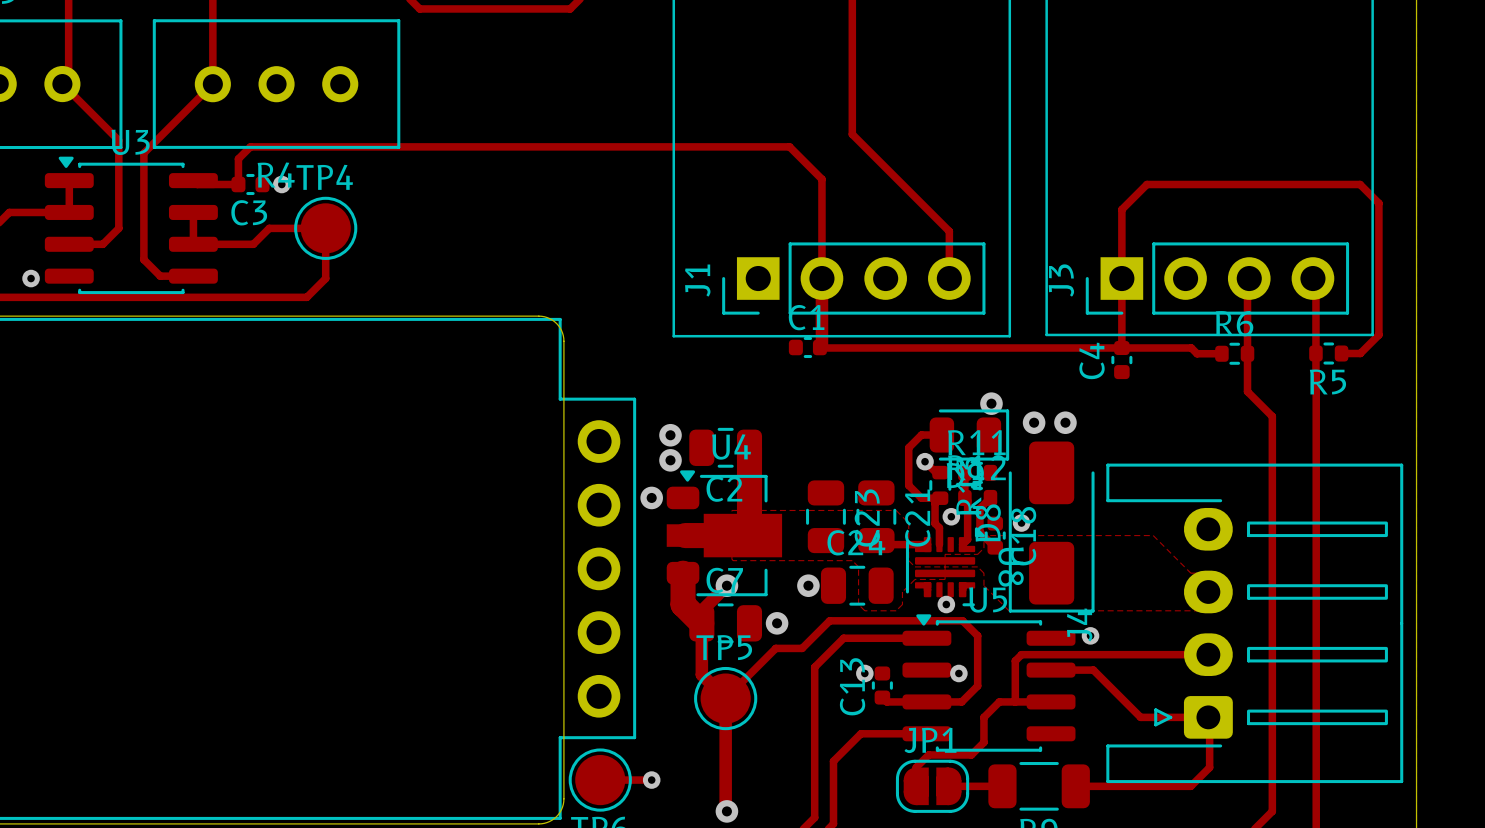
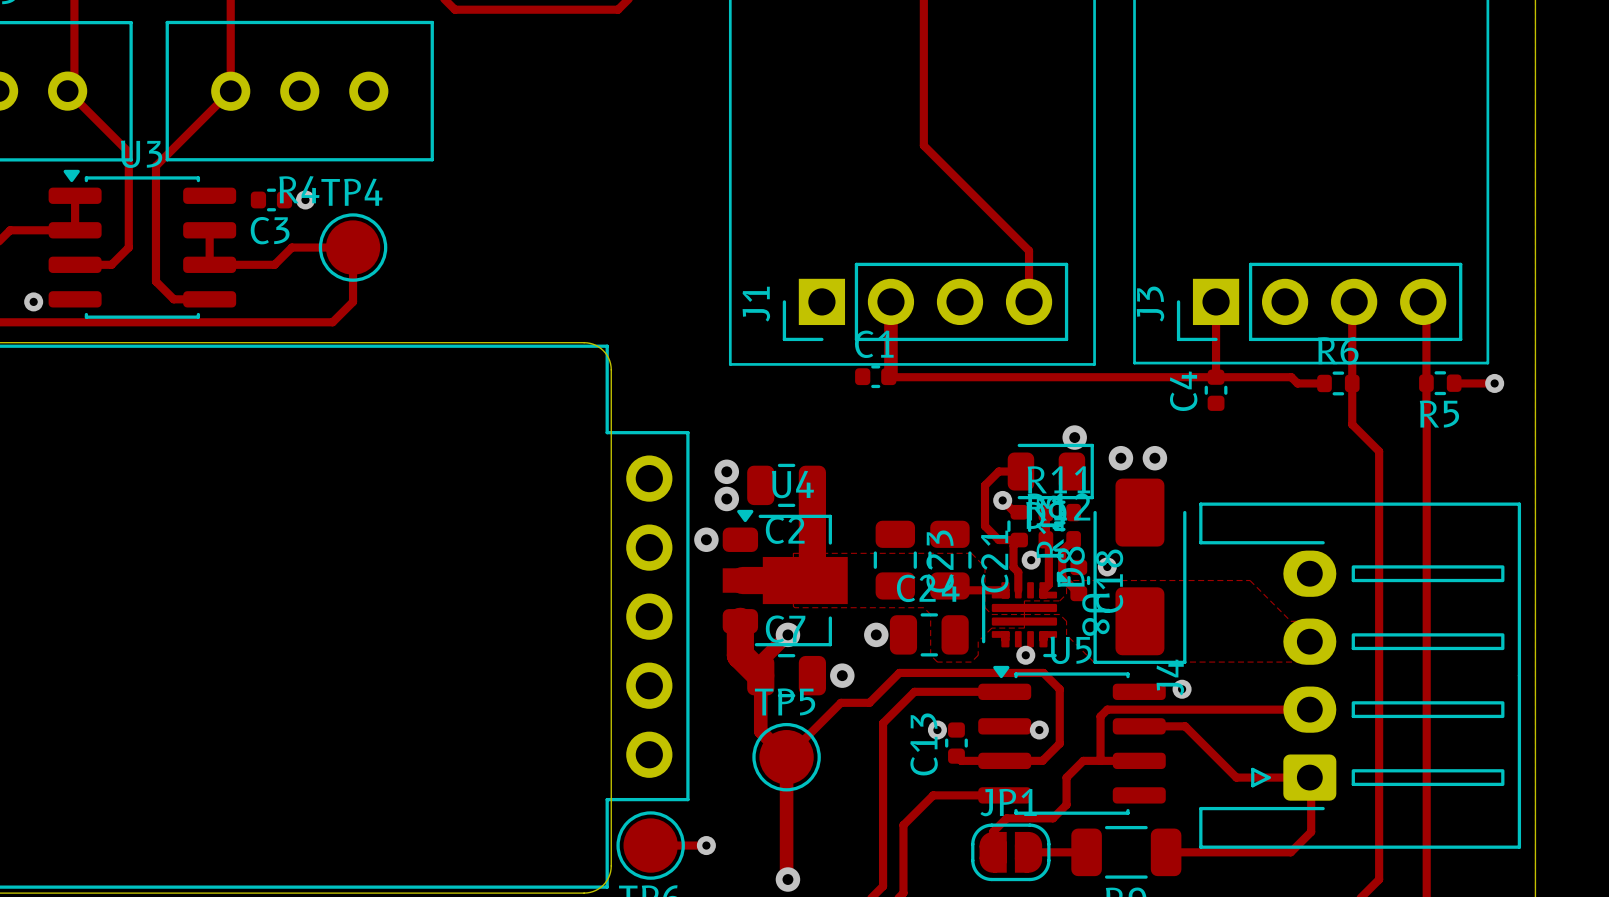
track: (193, 180) (197, 184) (238, 184) (238, 158) (250, 146) (789, 146) (821, 179) (821, 278) -> none
track: (1121, 278) (1121, 209) (1146, 184) (1360, 184) (1378, 203) (1378, 334) (1360, 353) (1341, 353) -> (1494, 383) (1454, 383)
via: none -> (1494, 383)

